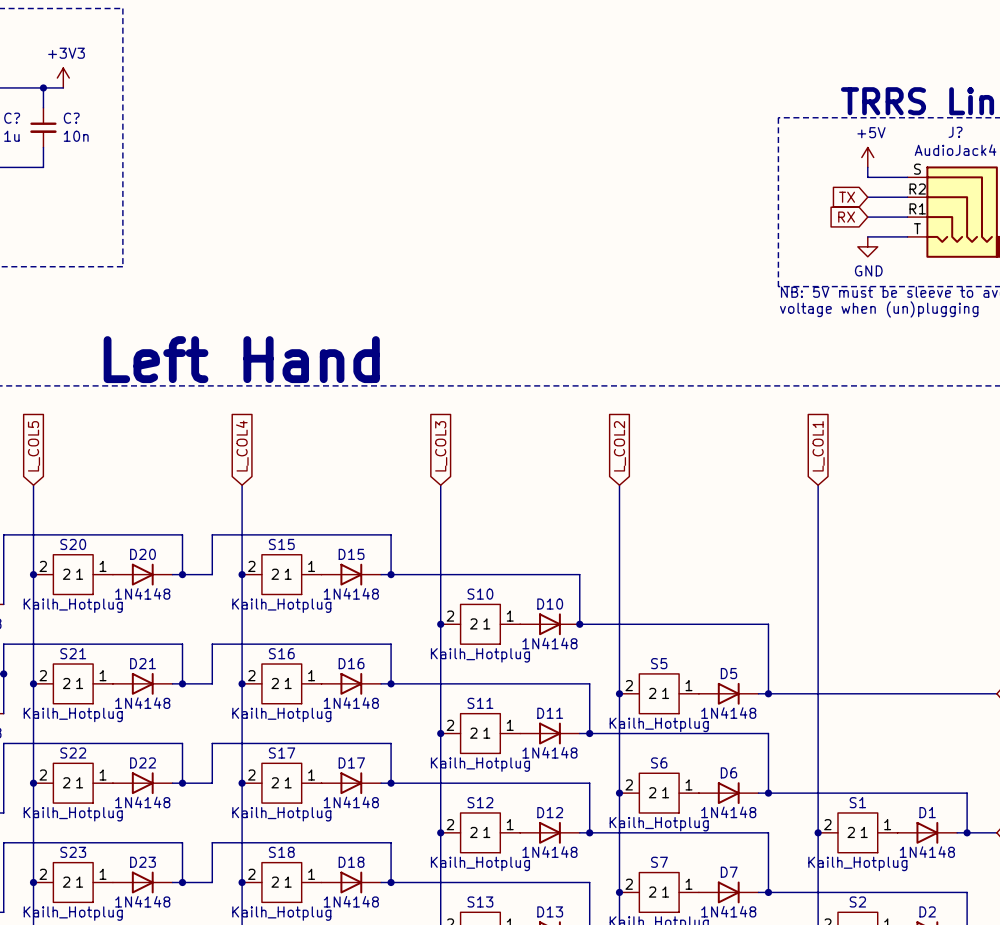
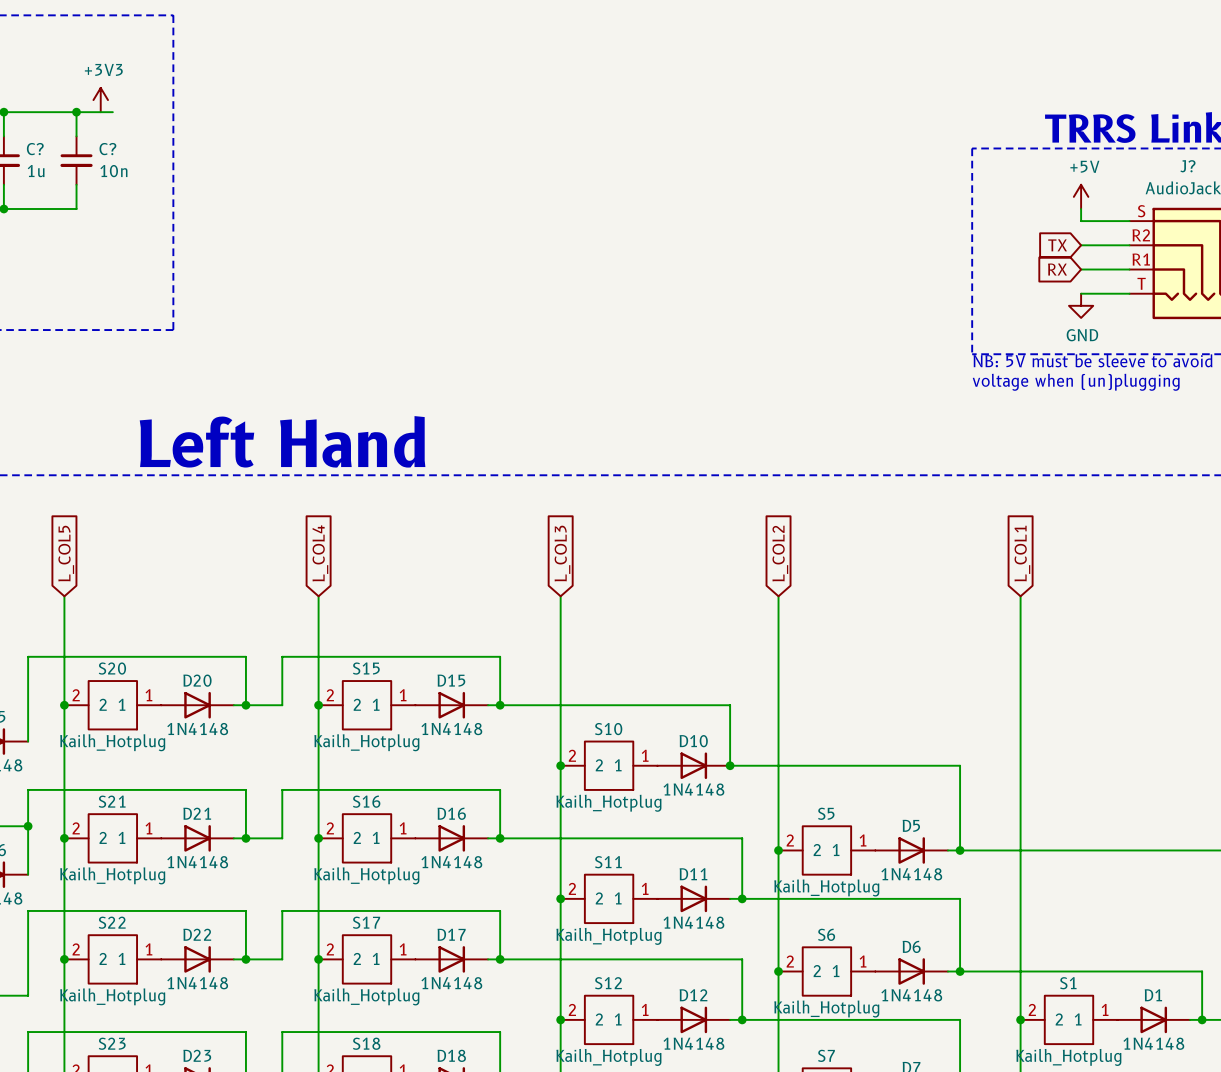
wire: none -> (100, 112) (112, 112)

